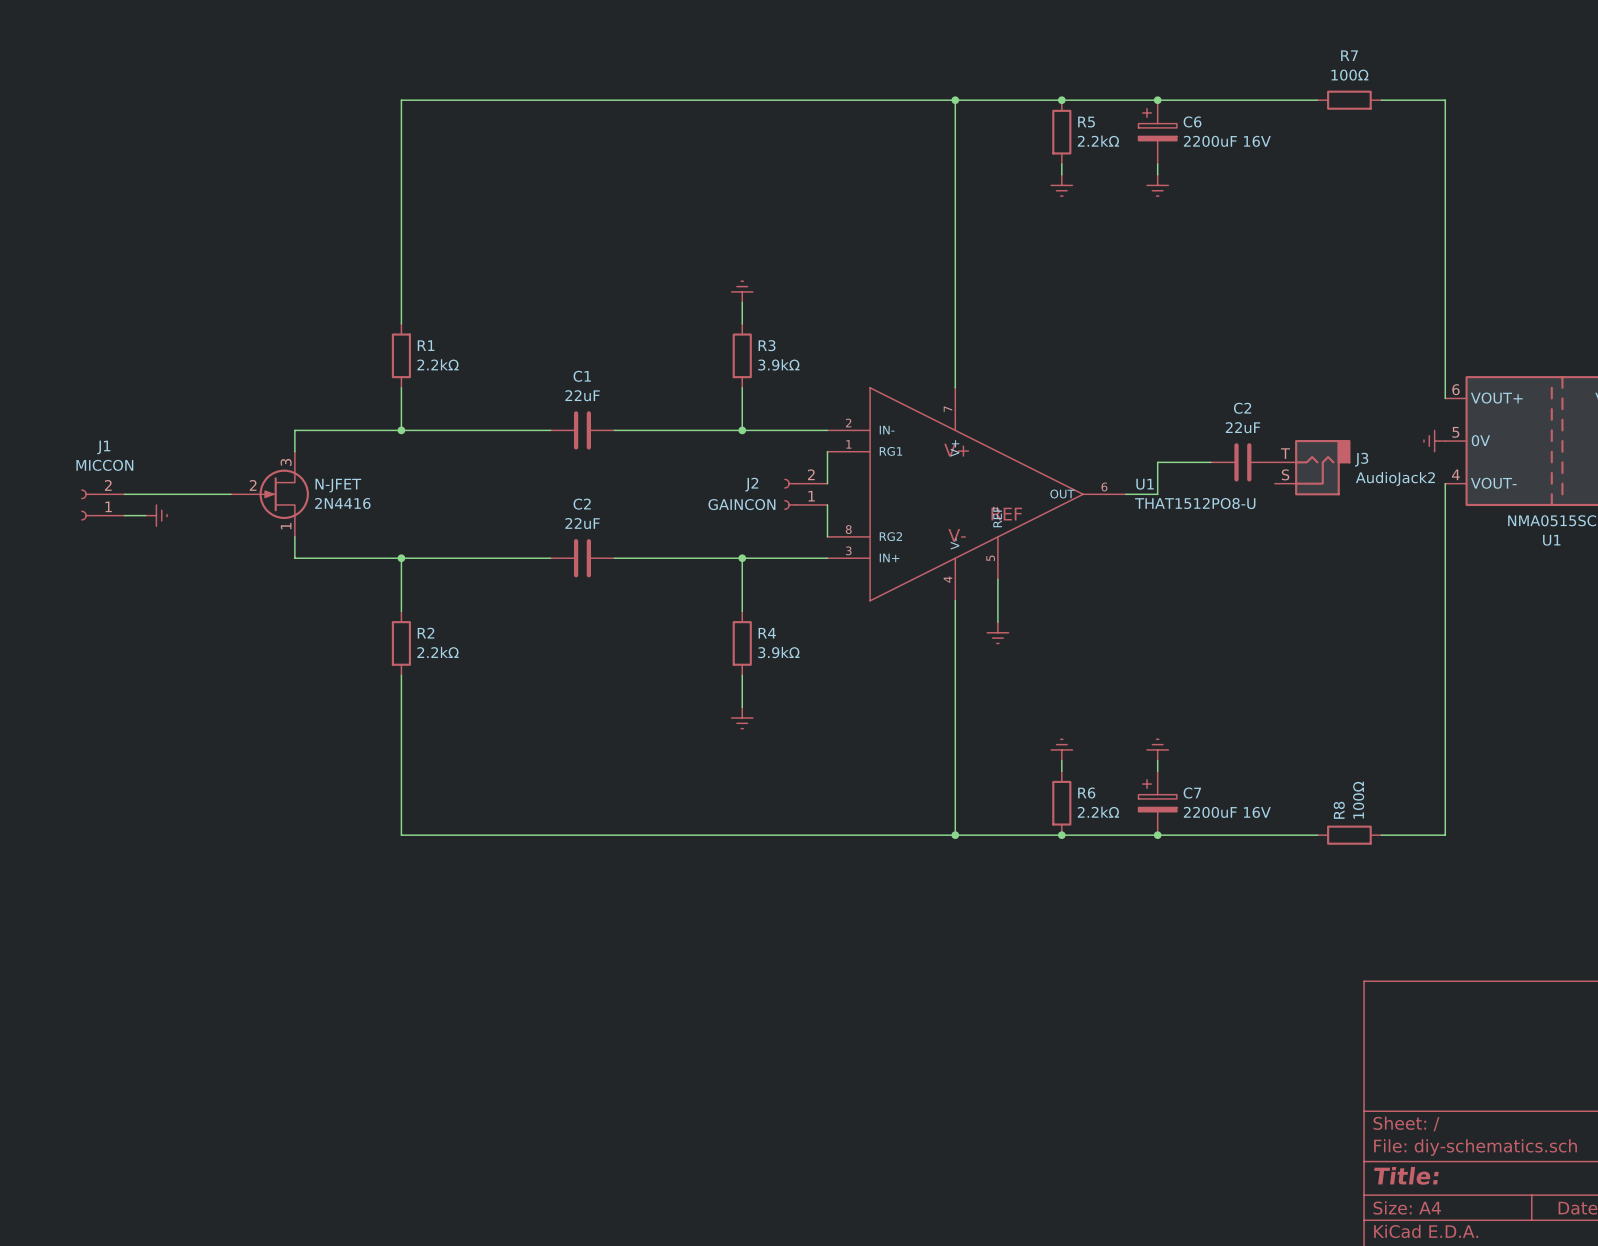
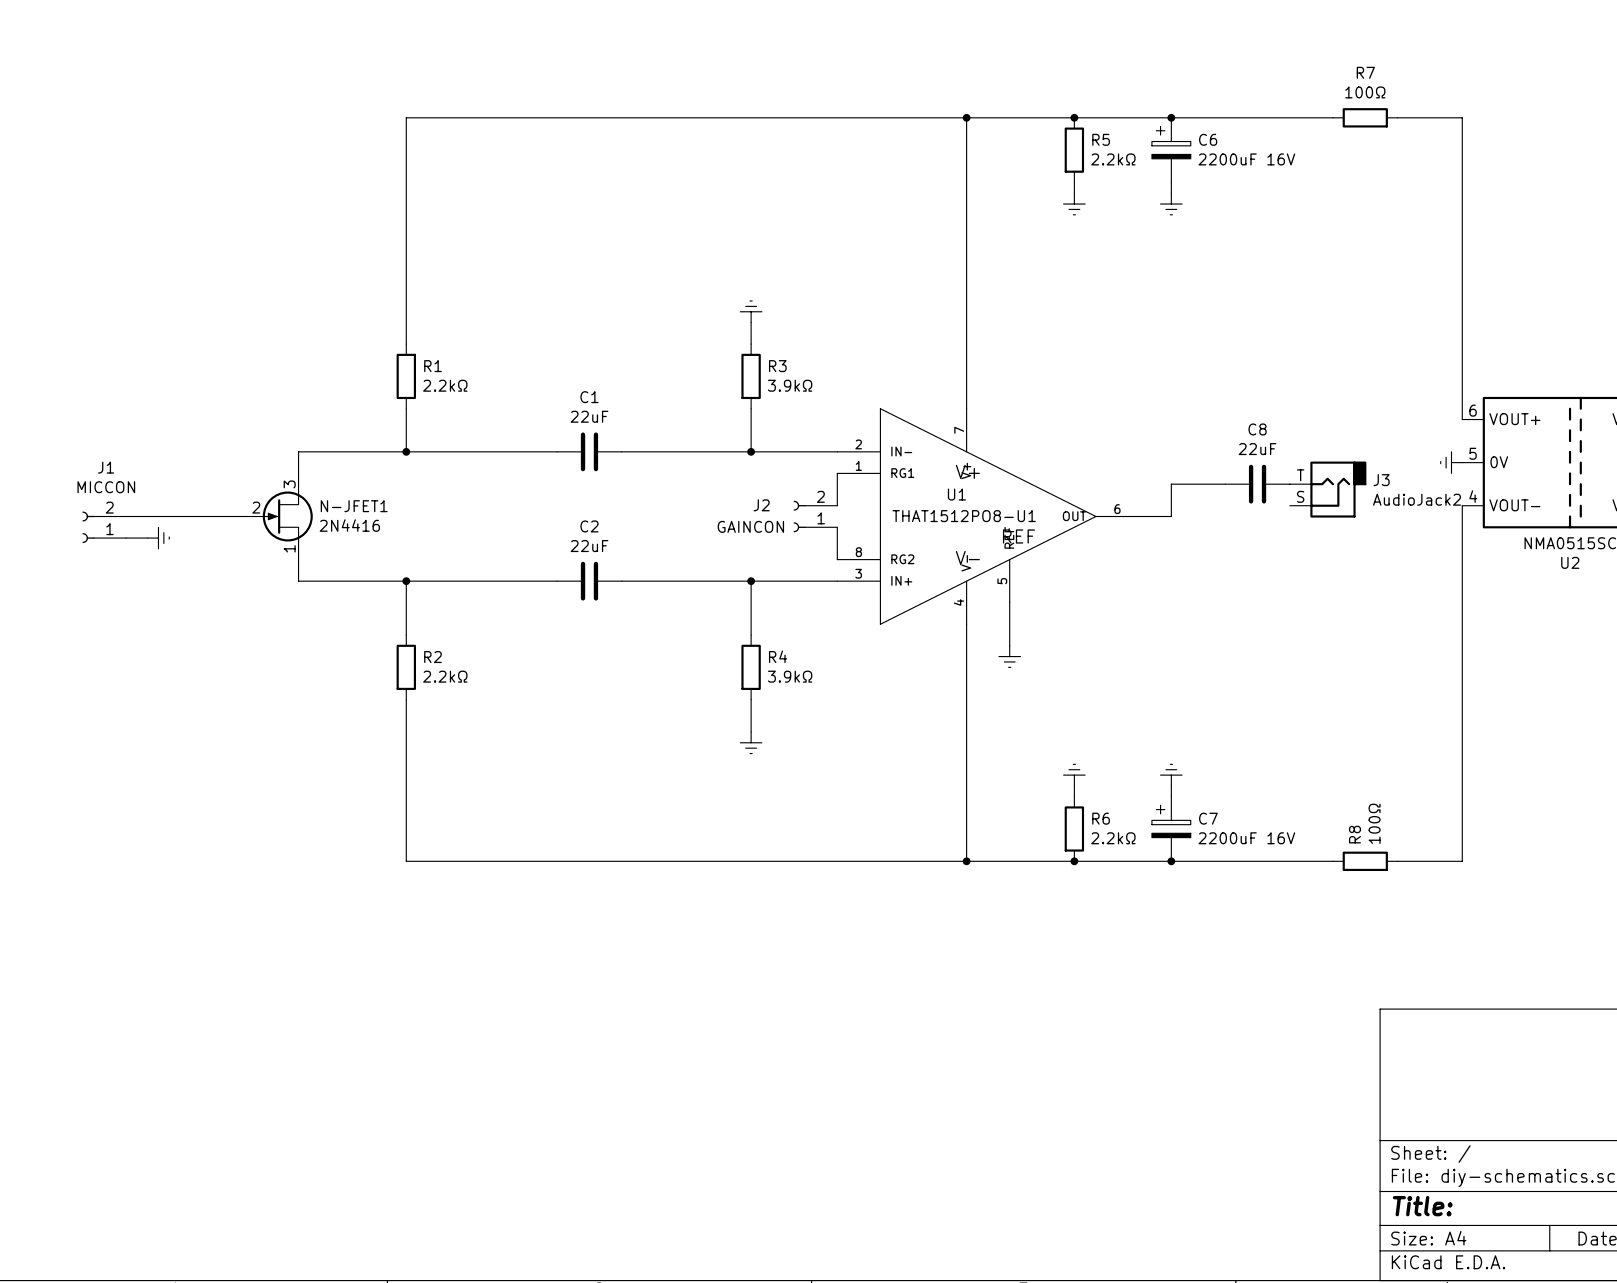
C2 name: C2 (1242, 408) -> C8 (1257, 429)
U1 name position: U1 (1145, 484) -> U1 (956, 494)
N-JFET name: N-JFET (338, 485) -> N-JFET1 (354, 506)
U1 value: THAT1512PO8-U (1195, 503) -> THAT1512PO8-U1 (964, 516)
U1 name: U1 (1551, 540) -> U2 (1570, 562)

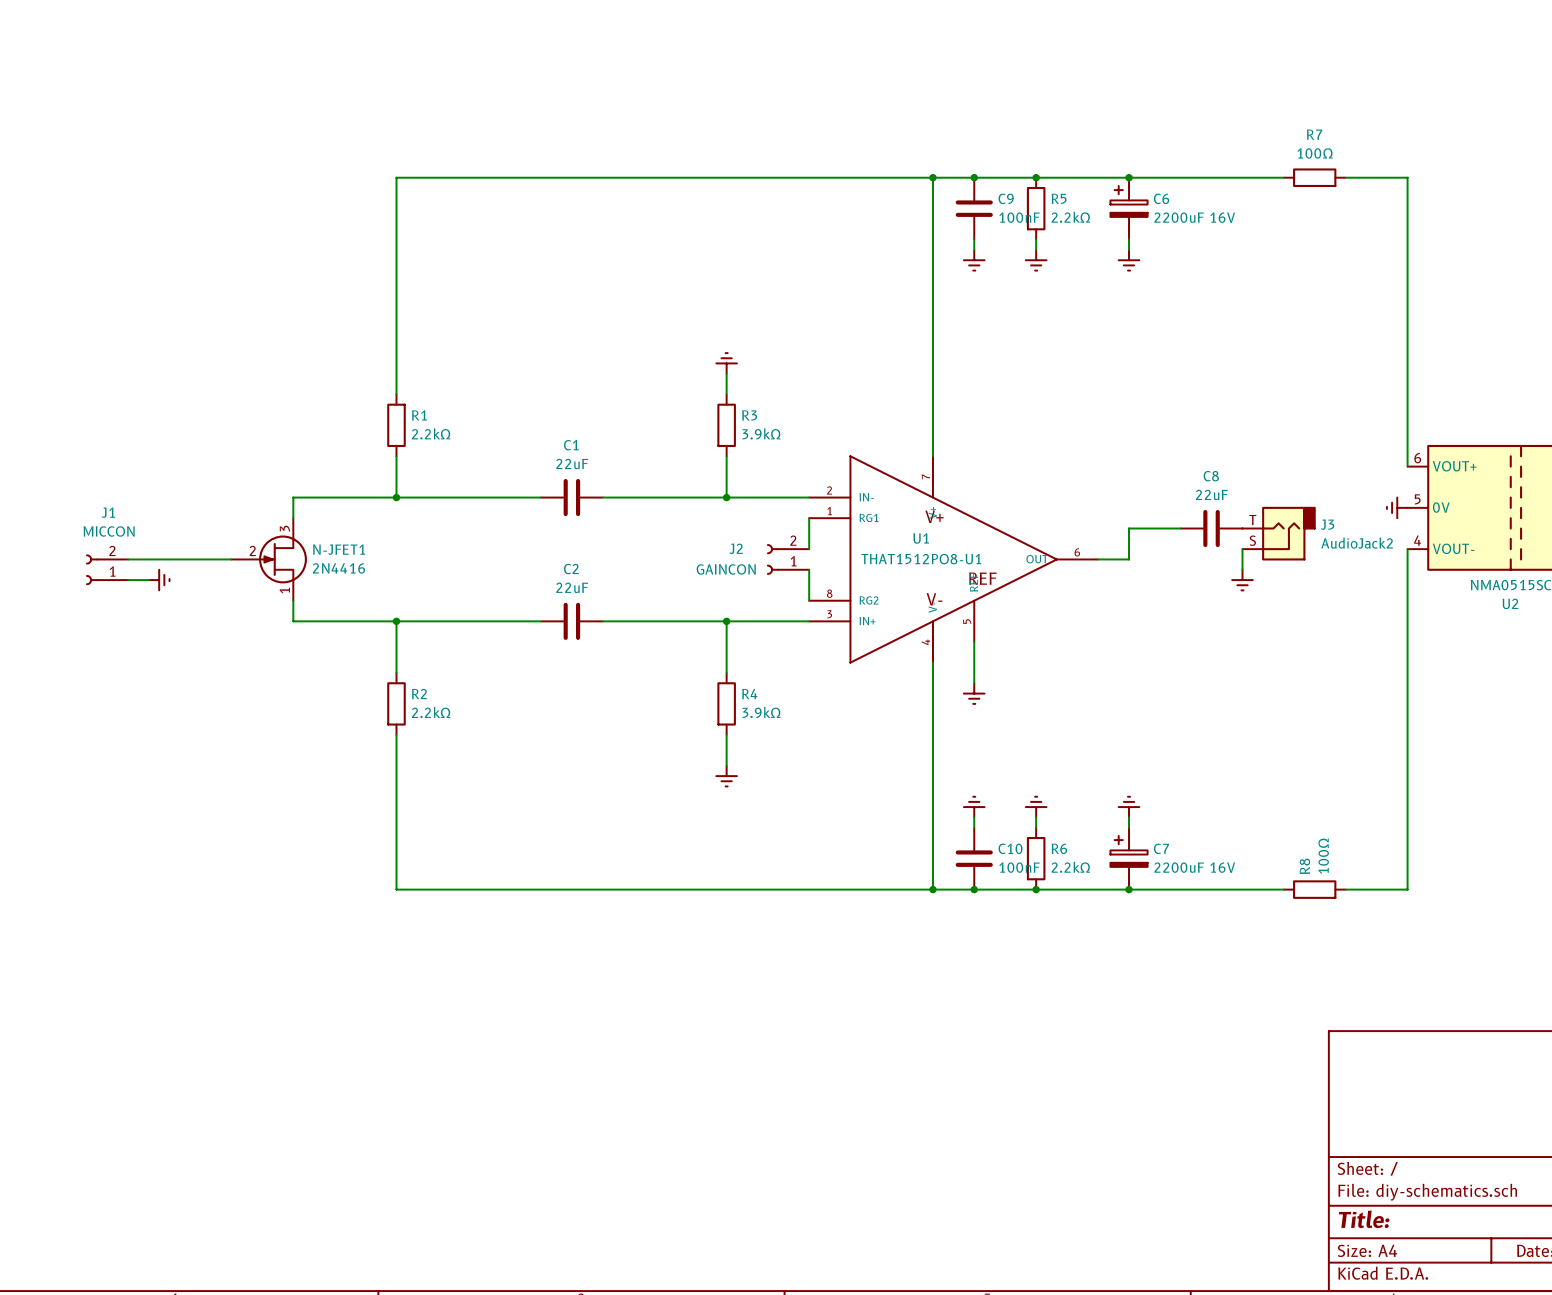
junction: none -> (974, 177)
C9: none -> 100nF (974, 208)
wire: none -> (974, 239) (974, 249)
power symbol: none -> (974, 260)
wire: none -> (1242, 549) (1242, 569)
power symbol: none -> (1242, 580)
power symbol: none -> (974, 807)
wire: none -> (974, 817) (974, 827)
C10: none -> 100nF (974, 858)
junction: none -> (974, 889)

